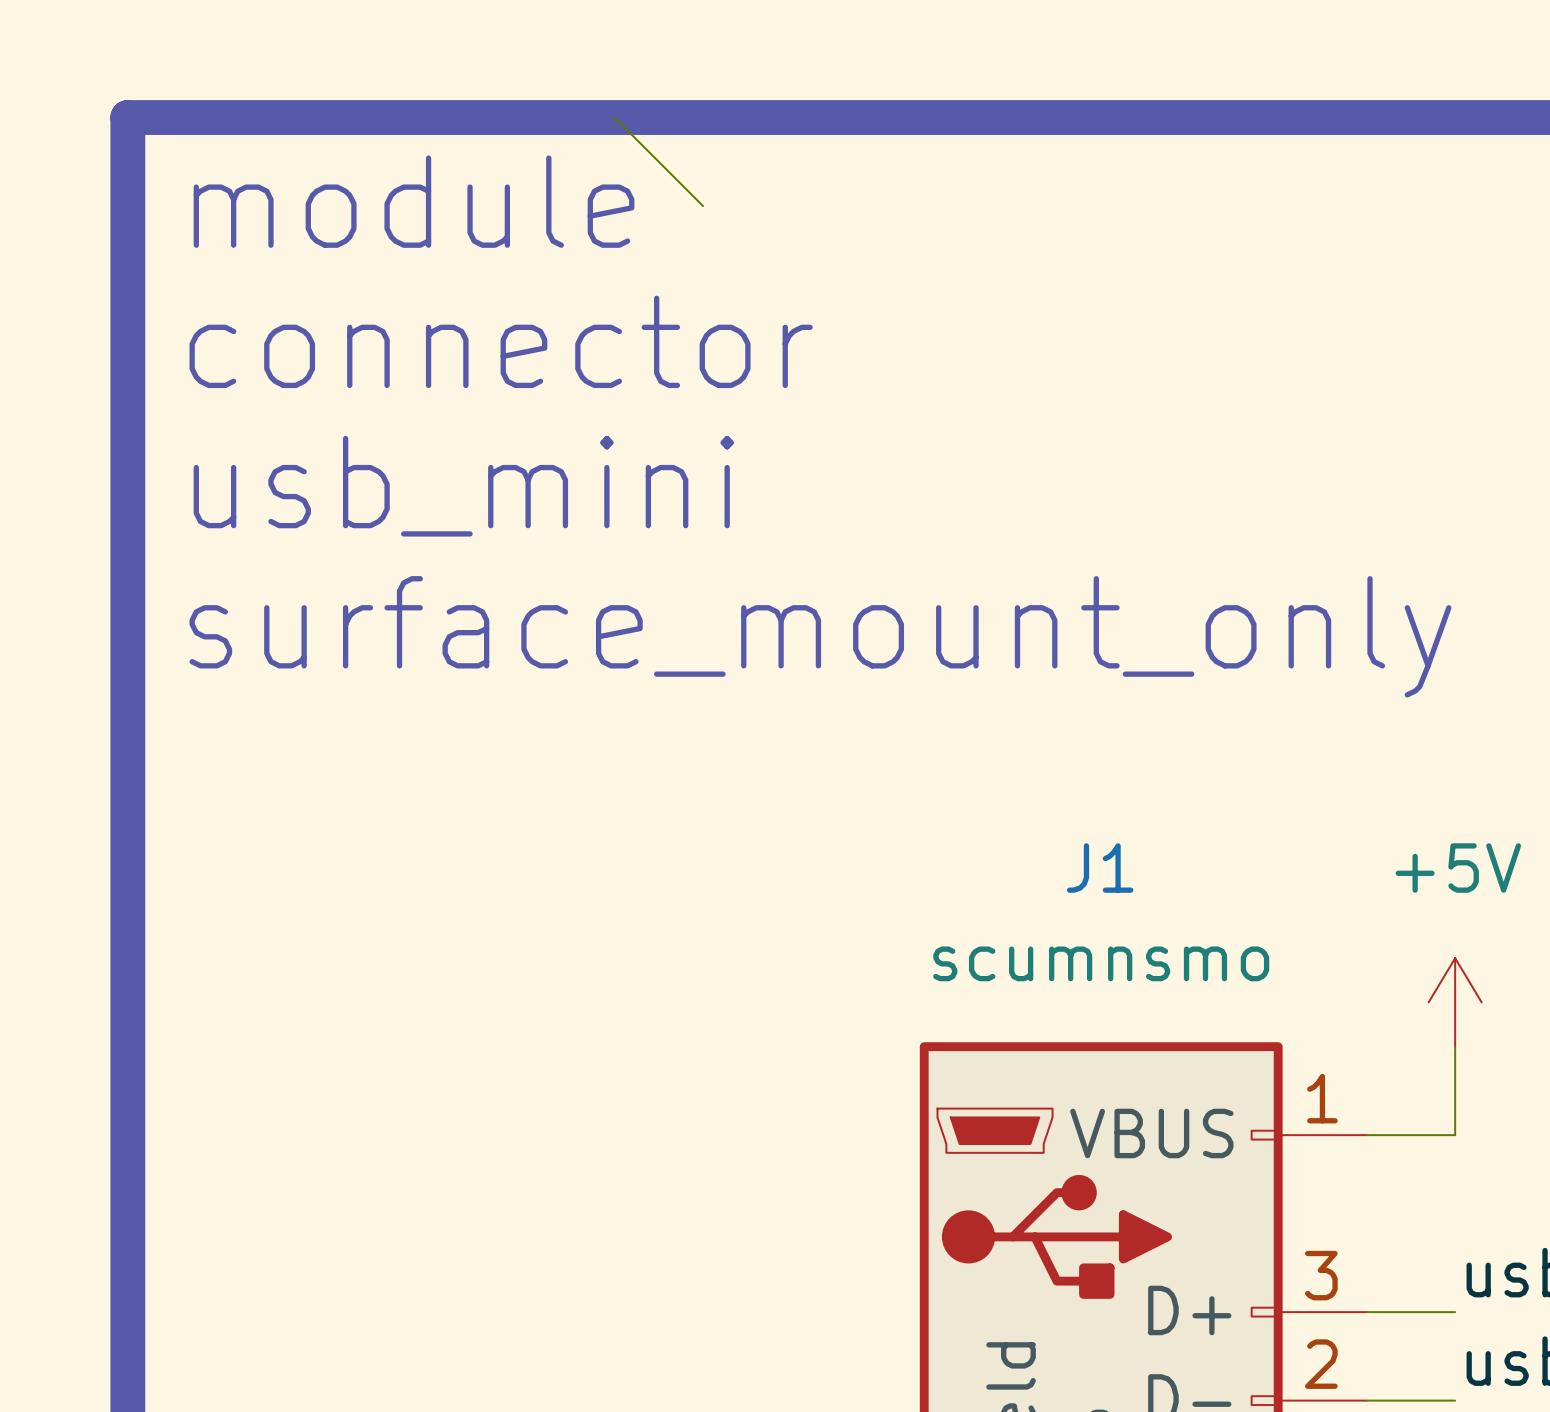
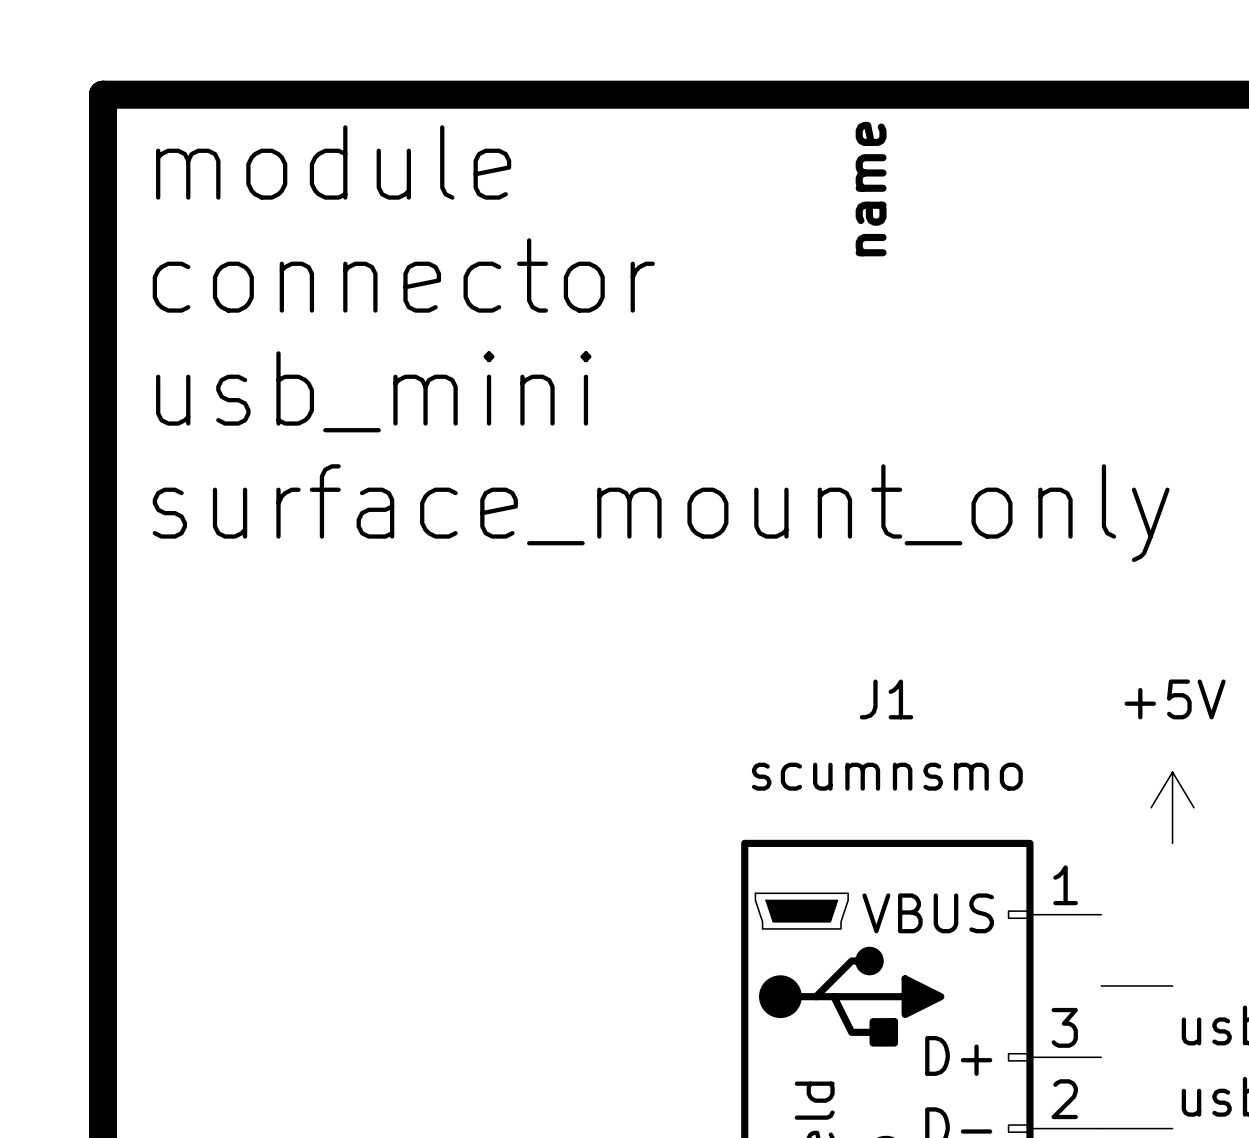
wire: (614, 117) (703, 206) -> none
text: none -> name (871, 189)
wire: (1455, 1046) (1455, 1135) (1366, 1135) -> none
wire: (1366, 1312) (1455, 1312) -> (1101, 985) (1172, 985)

